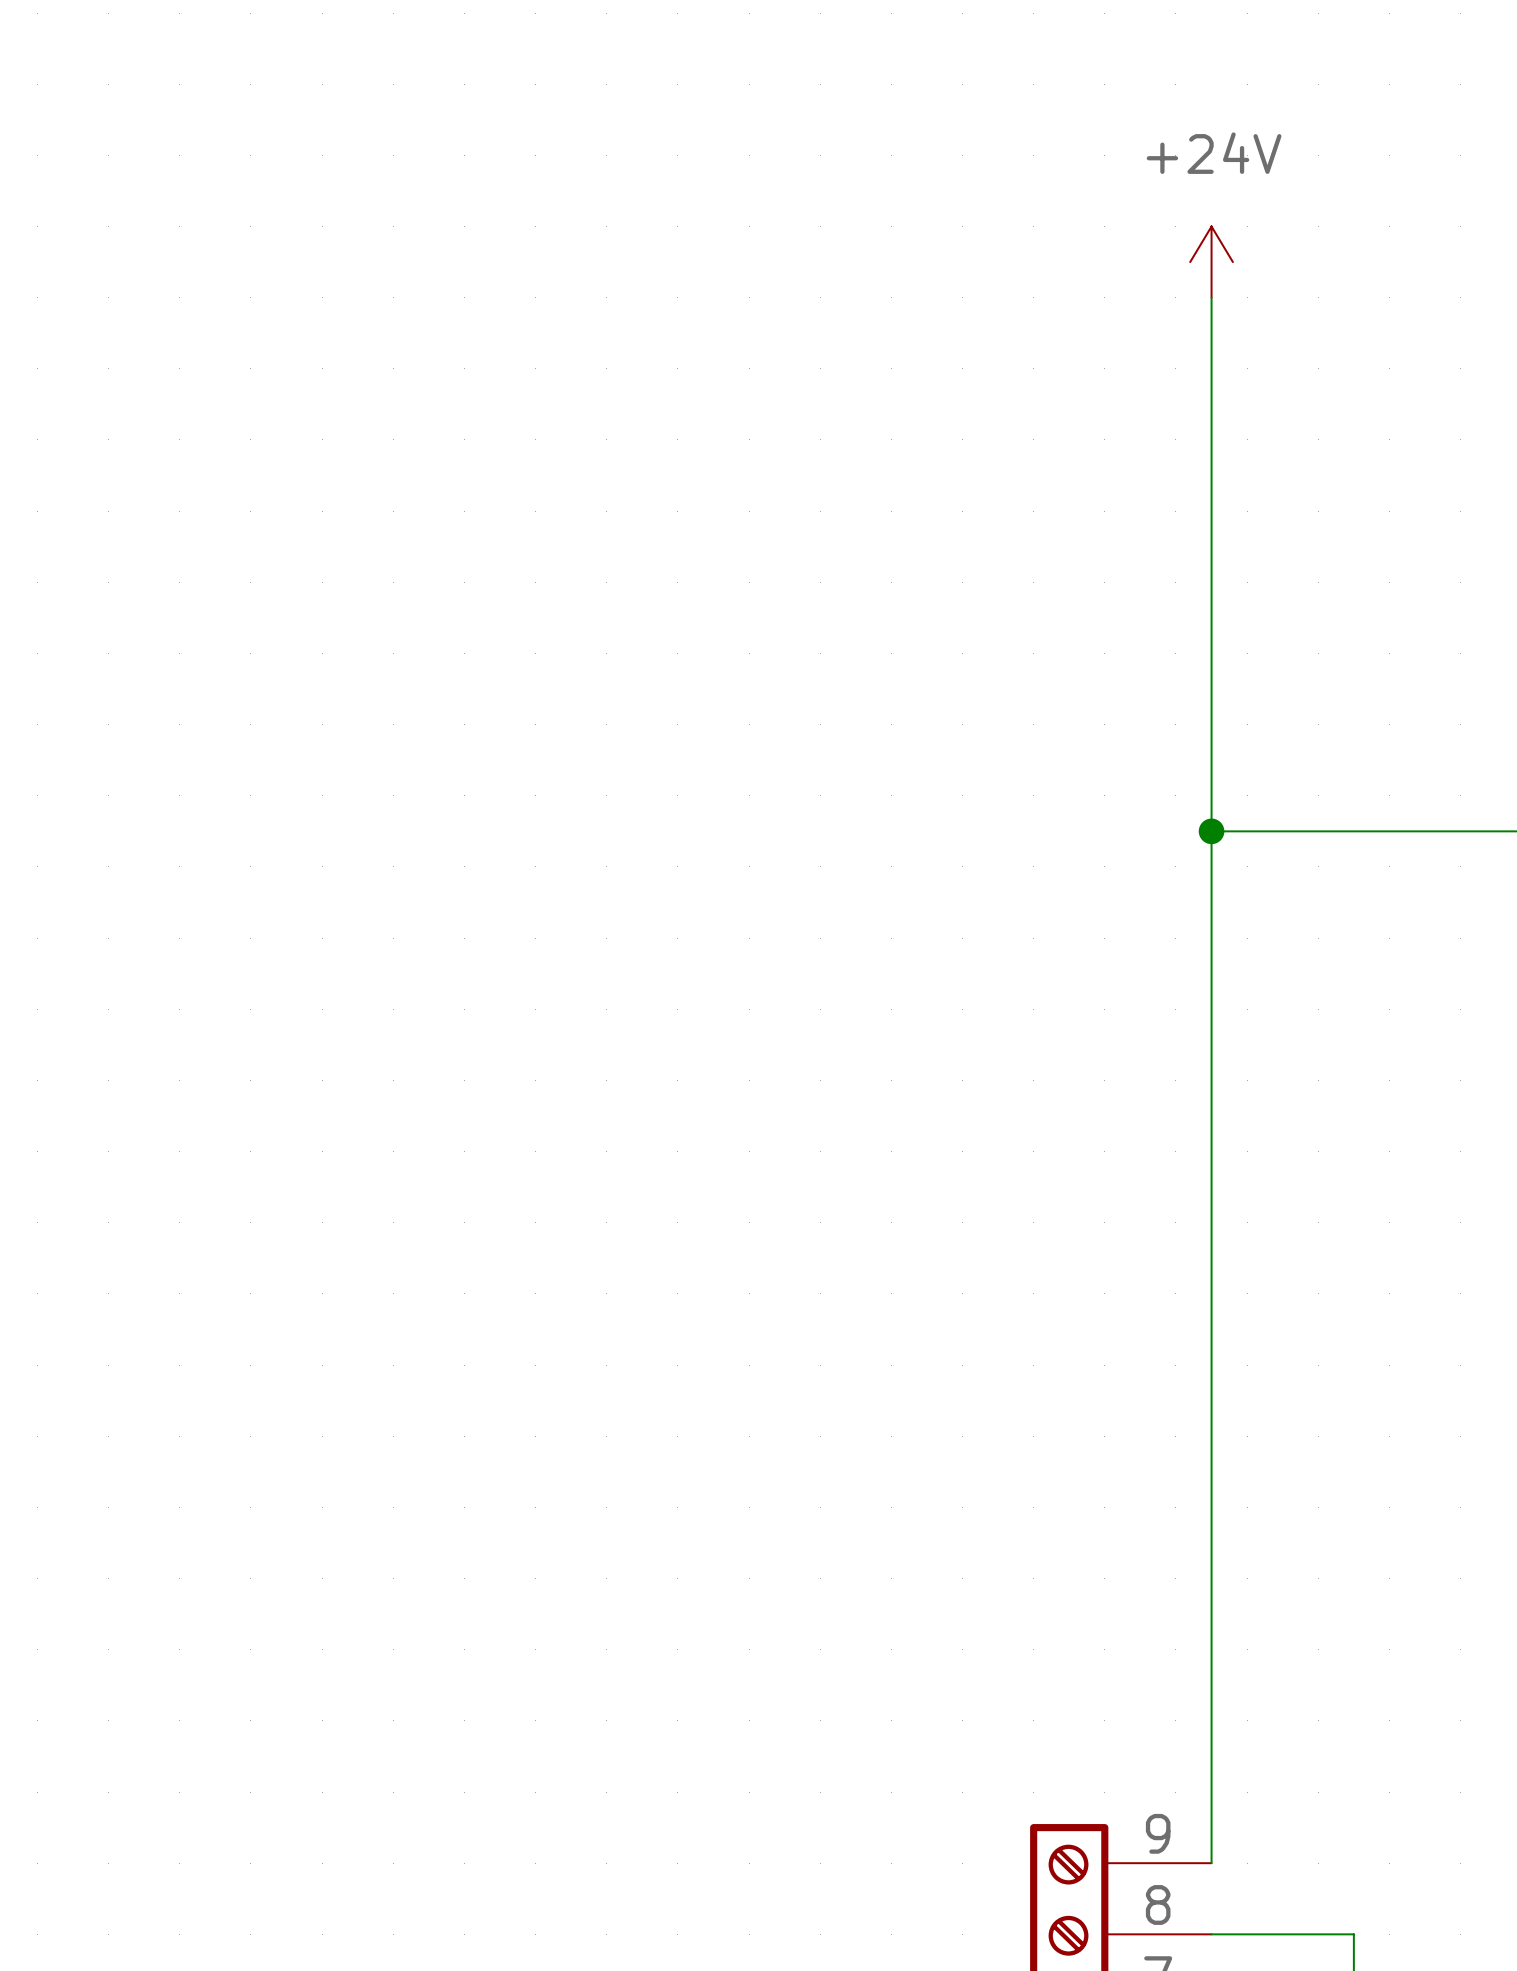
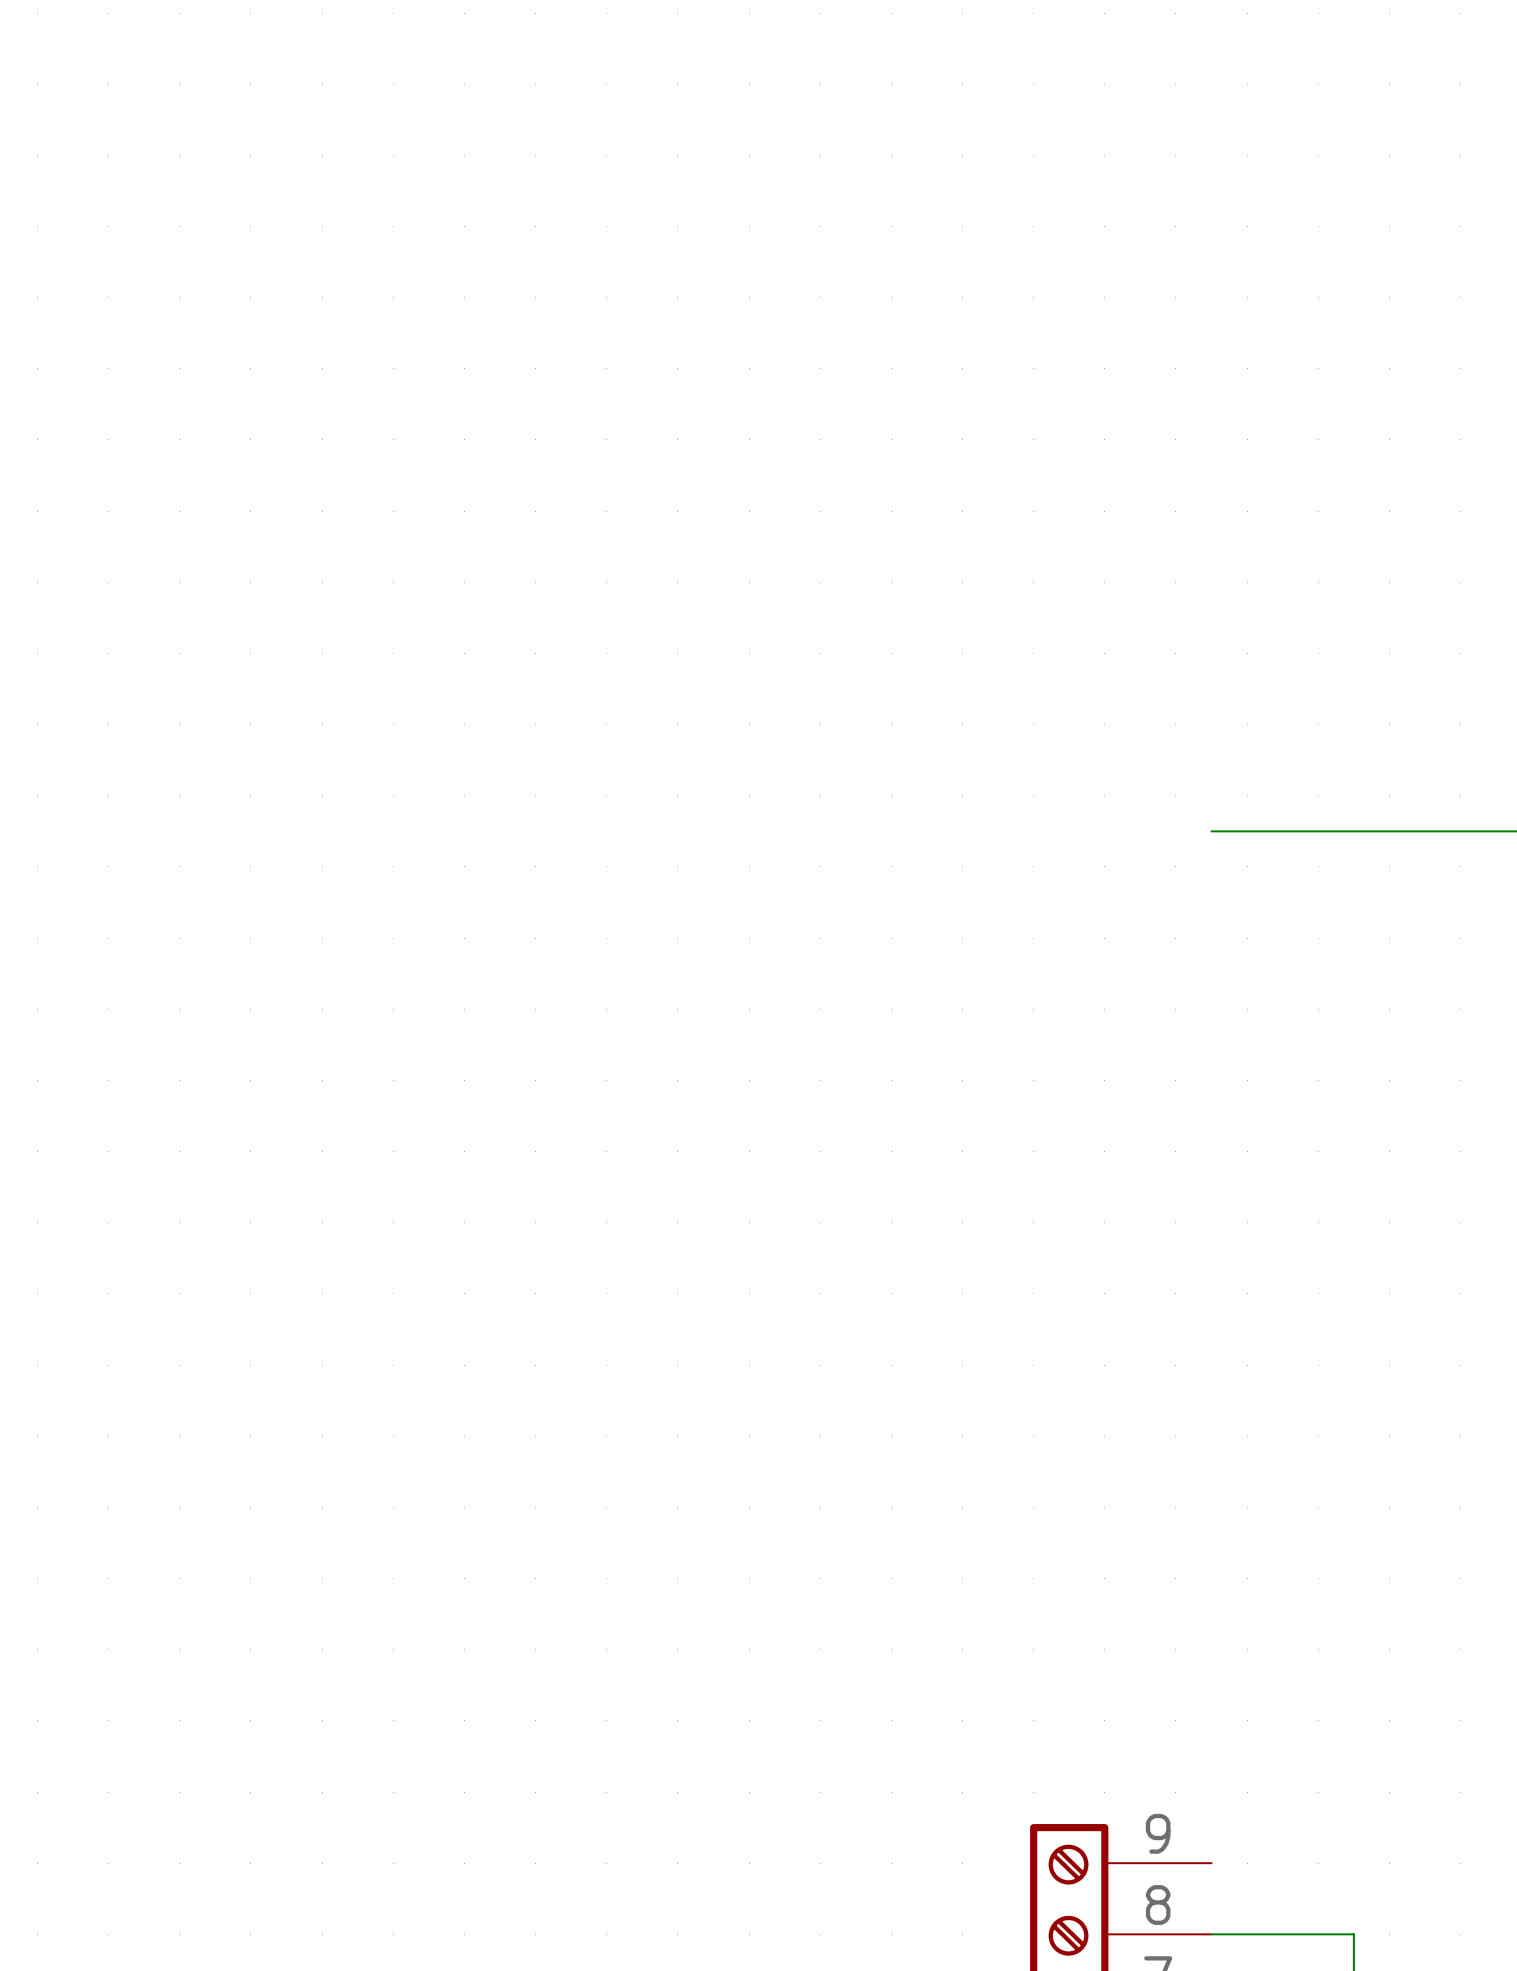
power symbol: +24V (1211, 262) -> none
wire: (1211, 297) (1211, 1863) -> none
junction: (1211, 831) -> none

